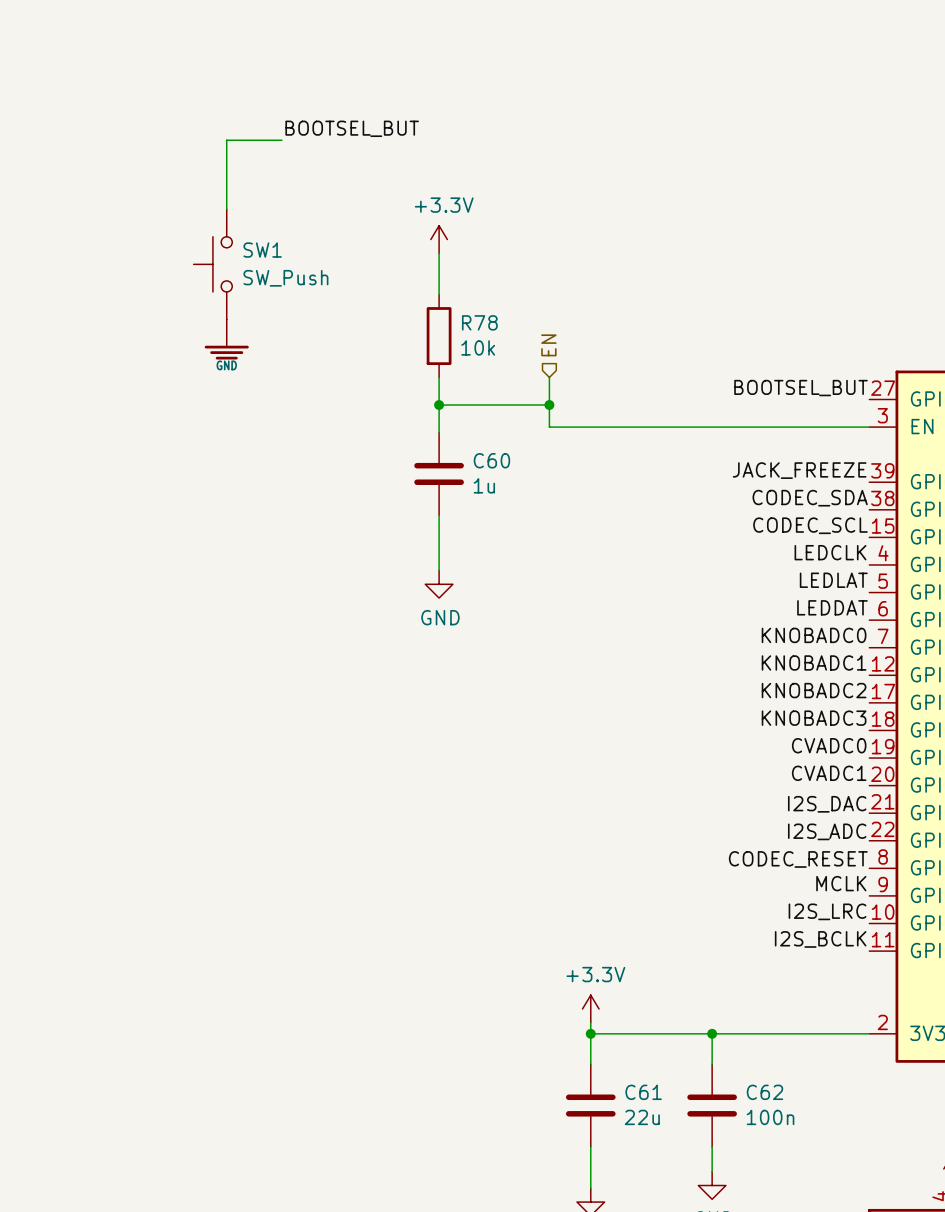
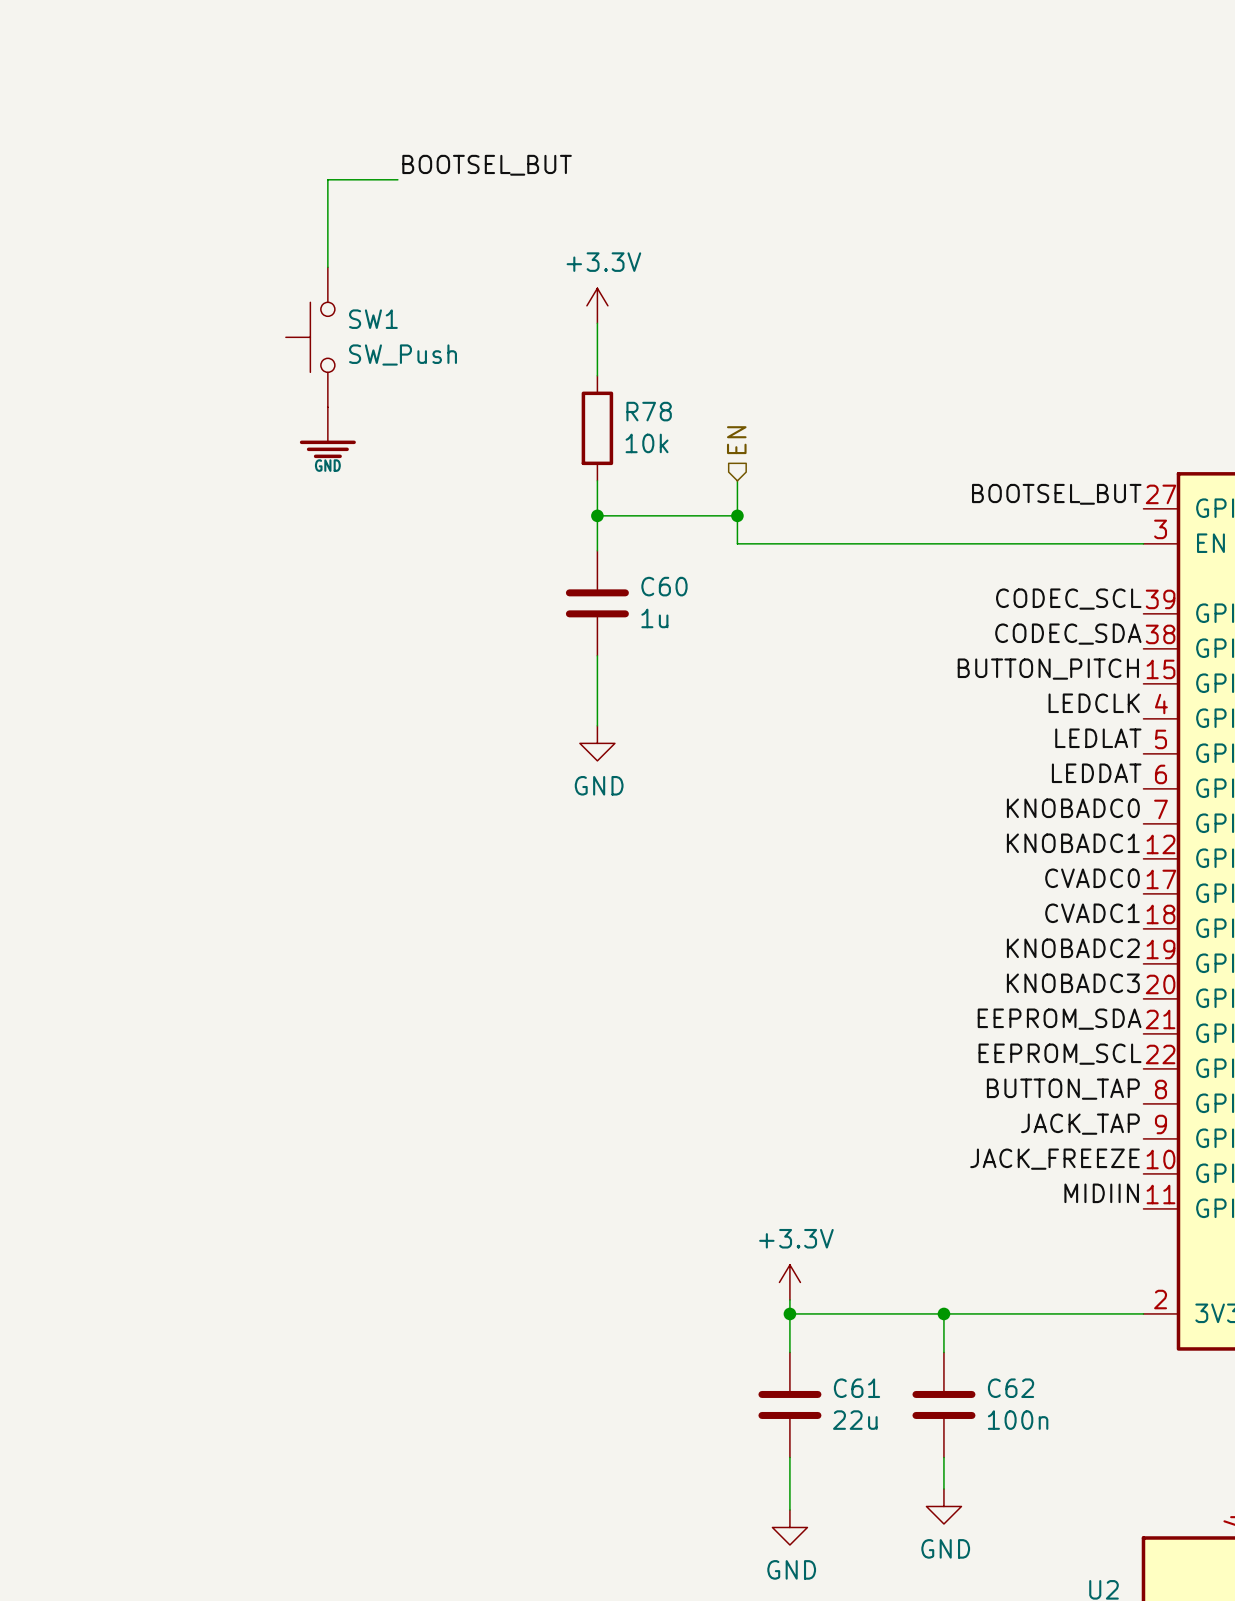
label: JACK_FREEZE (799, 470) -> CODEC_SCL (1068, 599)
label: CODEC_SCL (810, 525) -> BUTTON_PITCH (1048, 669)
label: KNOBADC2 (814, 690) -> CVADC0 (1092, 878)
label: KNOBADC3 (814, 718) -> CVADC1 (1092, 913)
label: CVADC0 (829, 745) -> KNOBADC2 (1073, 948)
label: CVADC1 (829, 773) -> KNOBADC3 (1073, 983)
label: I2S_DAC (827, 804) -> EEPROM_SDA (1059, 1019)
label: I2S_ADC (827, 831) -> EEPROM_SCL (1060, 1054)
label: CODEC_RESET (798, 859) -> BUTTON_TAP (1063, 1089)
label: MCLK (841, 883) -> JACK_TAP (1080, 1124)
label: I2S_LRC (827, 911) -> JACK_FREEZE (1055, 1159)
label: I2S_BCLK (820, 939) -> MIDIIN (1101, 1193)

